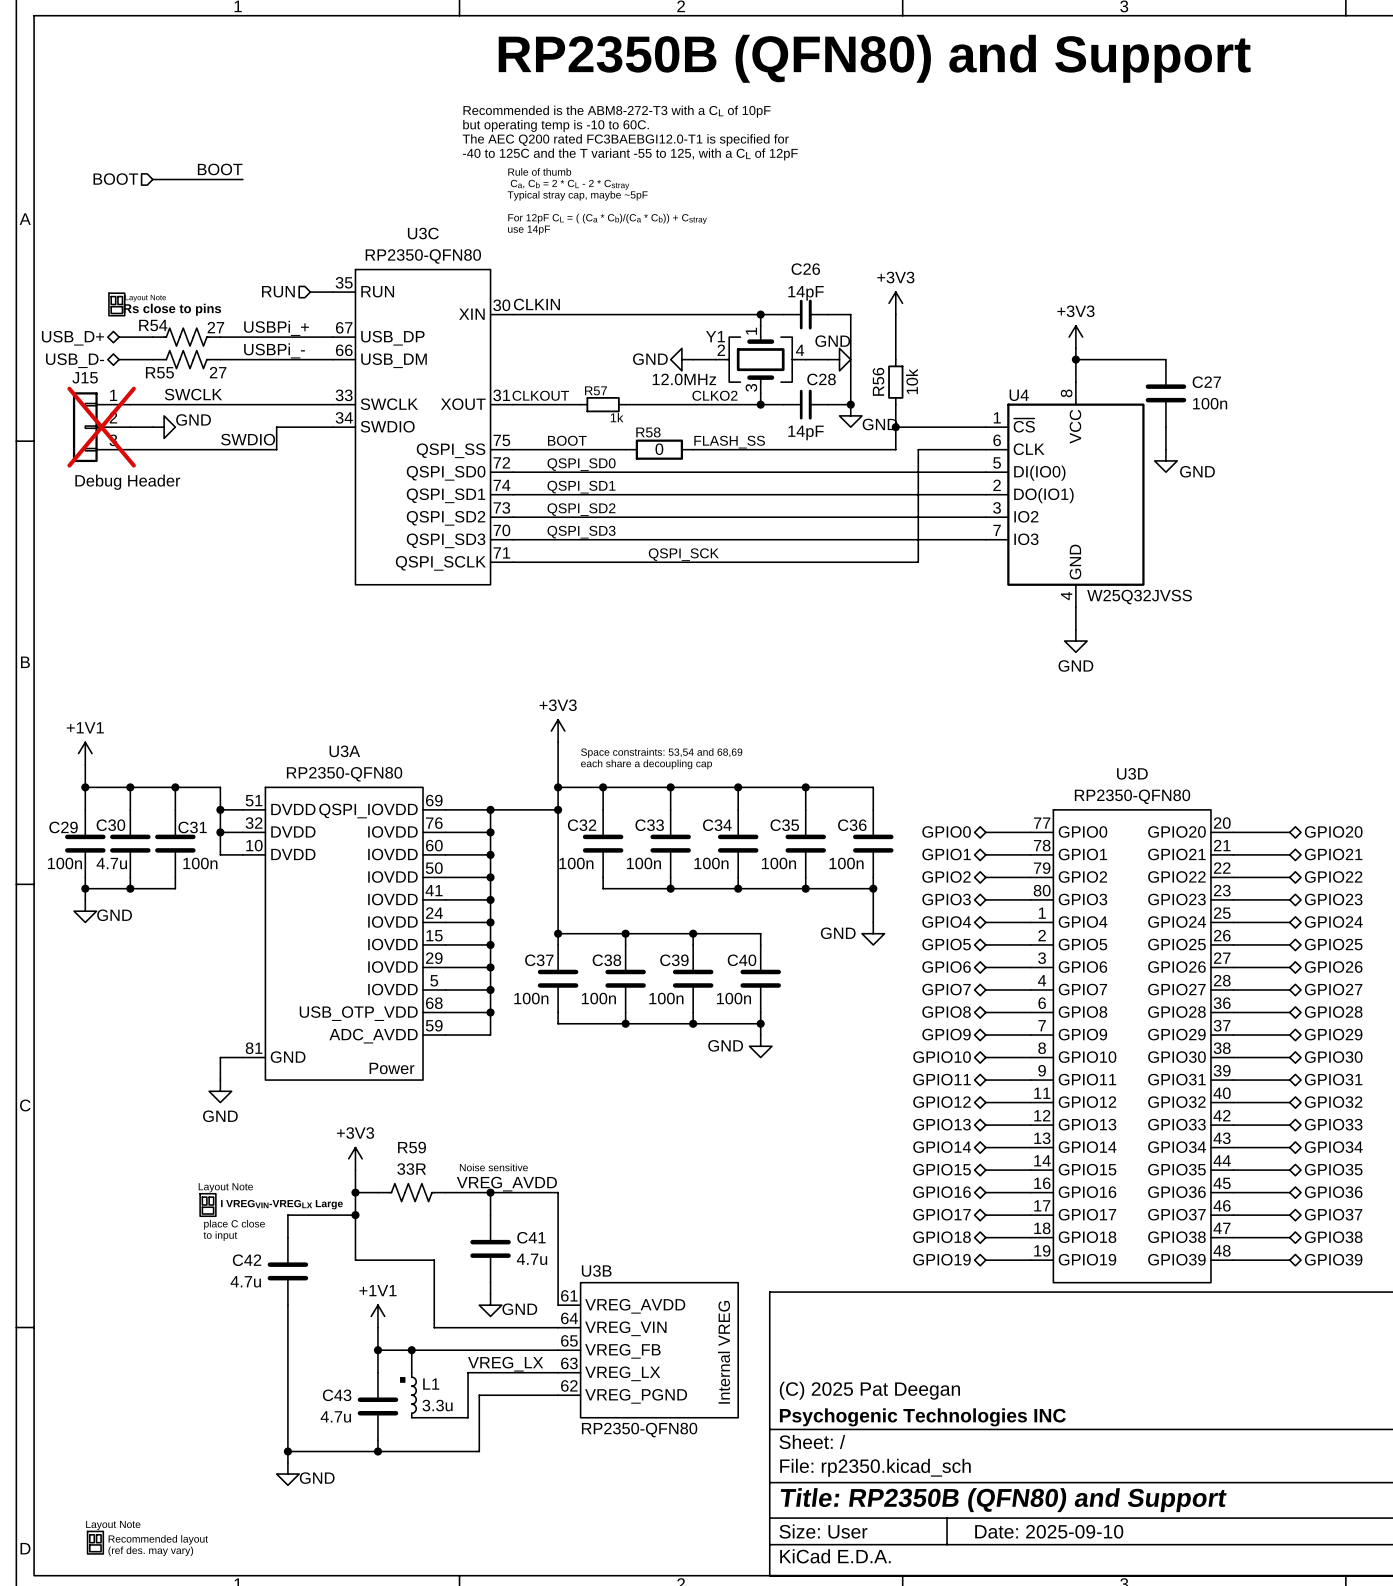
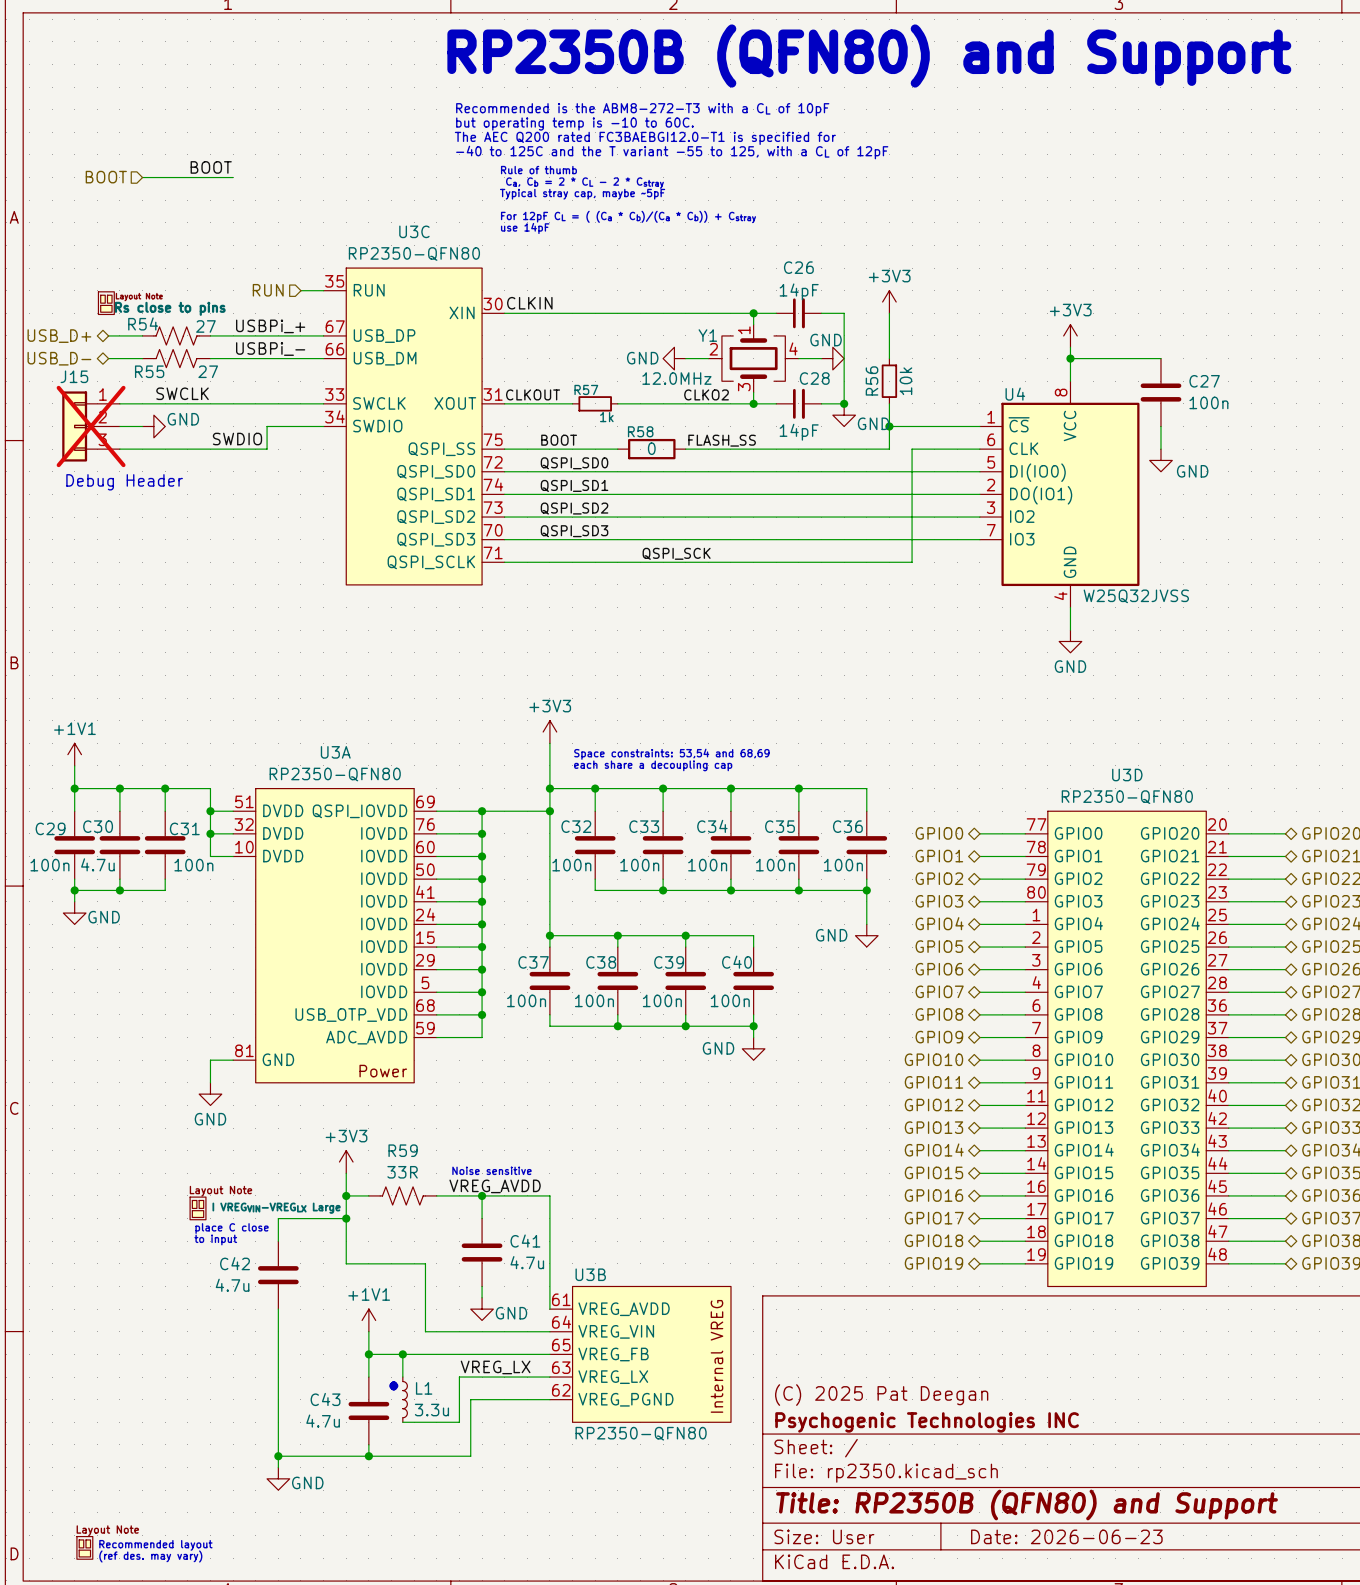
title block: Date: 2025-09-10 (1049, 1531) -> Date: 2026-06-23 (1066, 1536)

